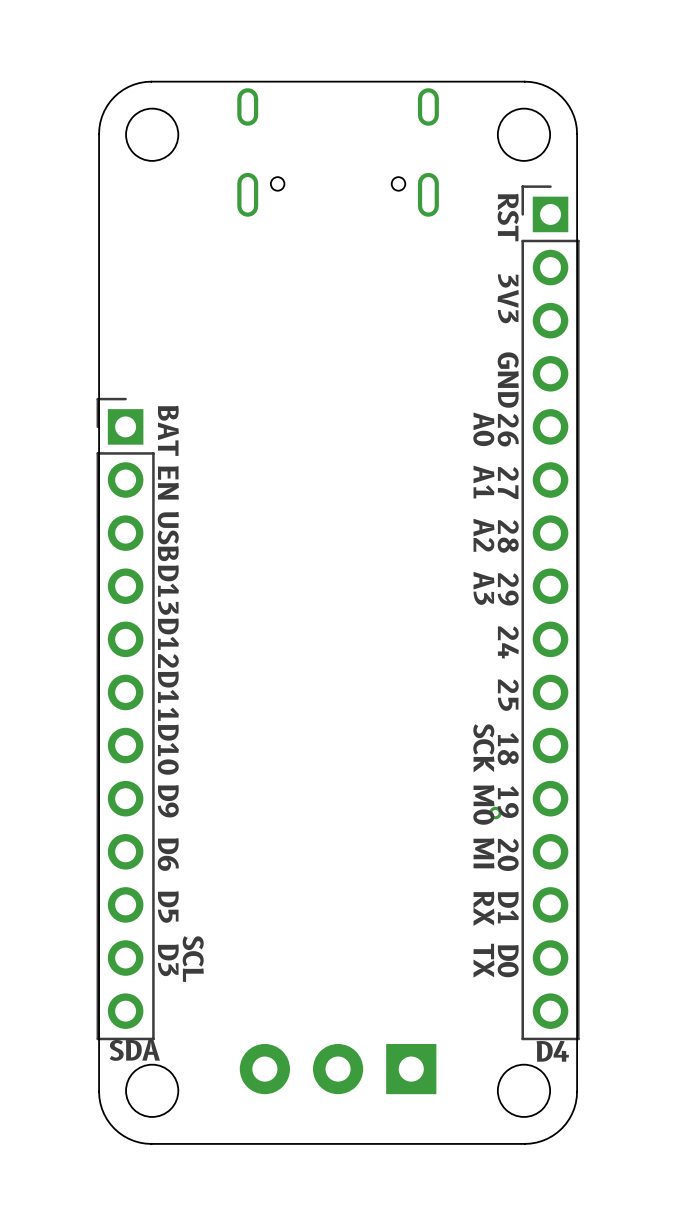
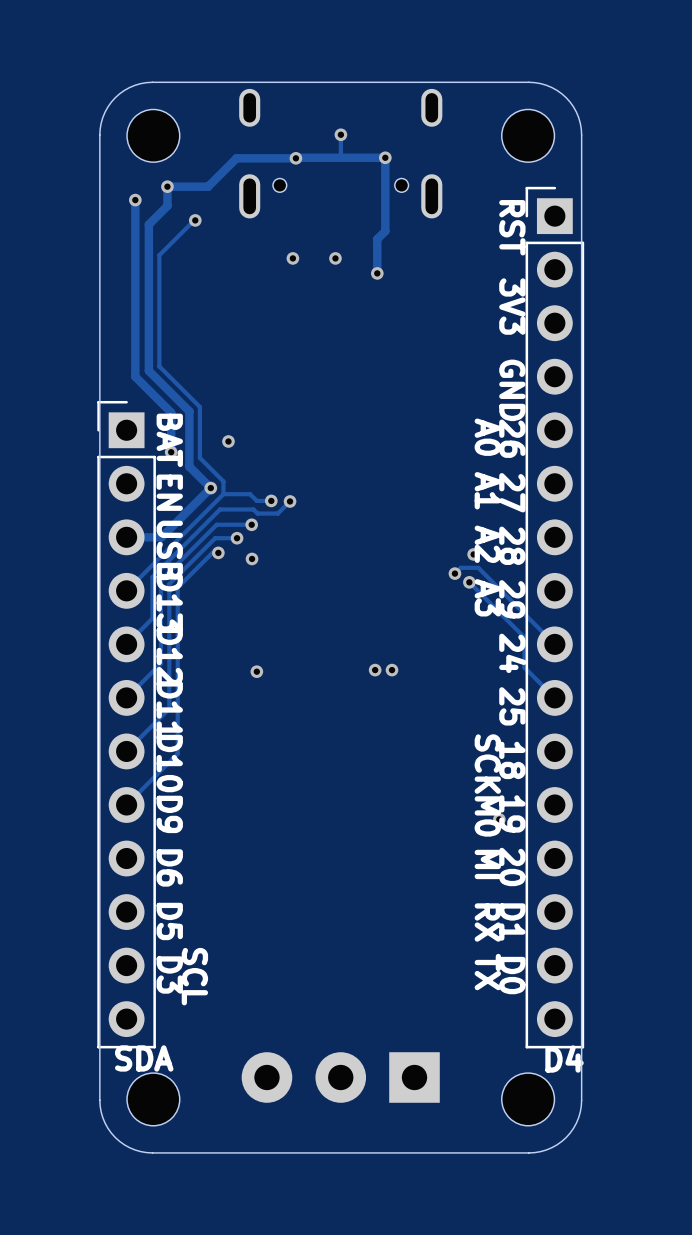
track: none -> (340, 134) (340, 157)
via: none -> (340, 134)
via: none -> (385, 157)
via: none -> (295, 158)
via: none -> (167, 186)
track: none -> (135, 200) (135, 376) (171, 412) (171, 452)
via: none -> (135, 200)
track: none -> (195, 220) (159, 255) (159, 366) (199, 407) (199, 457) (223, 481) (223, 494)
via: none -> (195, 220)
via: none -> (292, 258)
via: none -> (335, 258)
track: none -> (377, 273) (377, 239) (385, 231) (385, 157) (236, 158) (208, 186) (167, 186) (167, 205) (148, 224) (148, 370) (189, 411) (189, 466) (210, 488) (161, 537) (126, 537)
via: none -> (377, 273)
via: none -> (228, 441)
via: none -> (171, 452)
via: none -> (210, 488)
track: none -> (223, 494) (250, 494) (256, 500) (271, 500)
track: none -> (223, 494) (126, 590)
via: none -> (271, 500)
track: none -> (290, 501) (277, 513) (257, 513) (253, 509) (220, 509) (152, 577) (152, 618) (126, 644)
via: none -> (290, 501)
track: none -> (251, 524) (216, 524) (160, 580) (160, 663) (126, 697)
via: none -> (251, 524)
track: none -> (237, 538) (215, 538) (169, 584) (169, 708) (126, 751)
via: none -> (237, 538)
track: none -> (218, 552) (212, 552) (177, 587) (177, 753) (126, 804)
via: none -> (218, 552)
via: none -> (473, 554)
via: none -> (252, 558)
track: none -> (454, 573) (460, 567) (478, 567) (554, 644)
via: none -> (454, 573)
track: none -> (469, 582) (524, 637) (524, 667) (554, 697)
via: none -> (469, 582)
via: none -> (375, 670)
via: none -> (392, 670)
via: none -> (256, 671)

